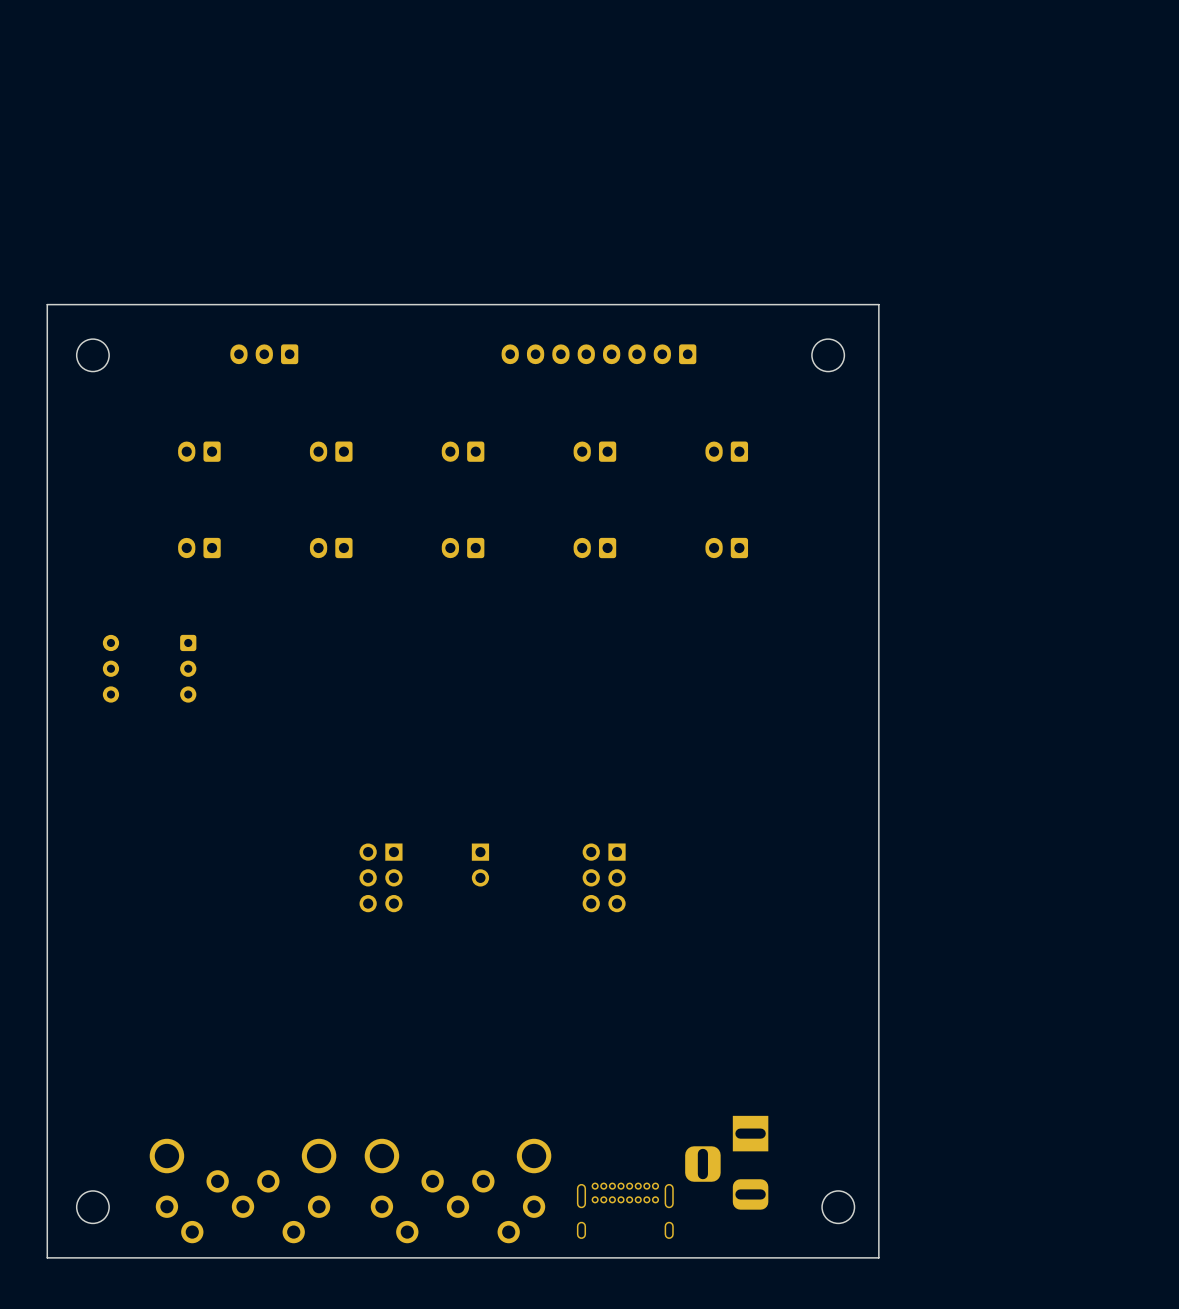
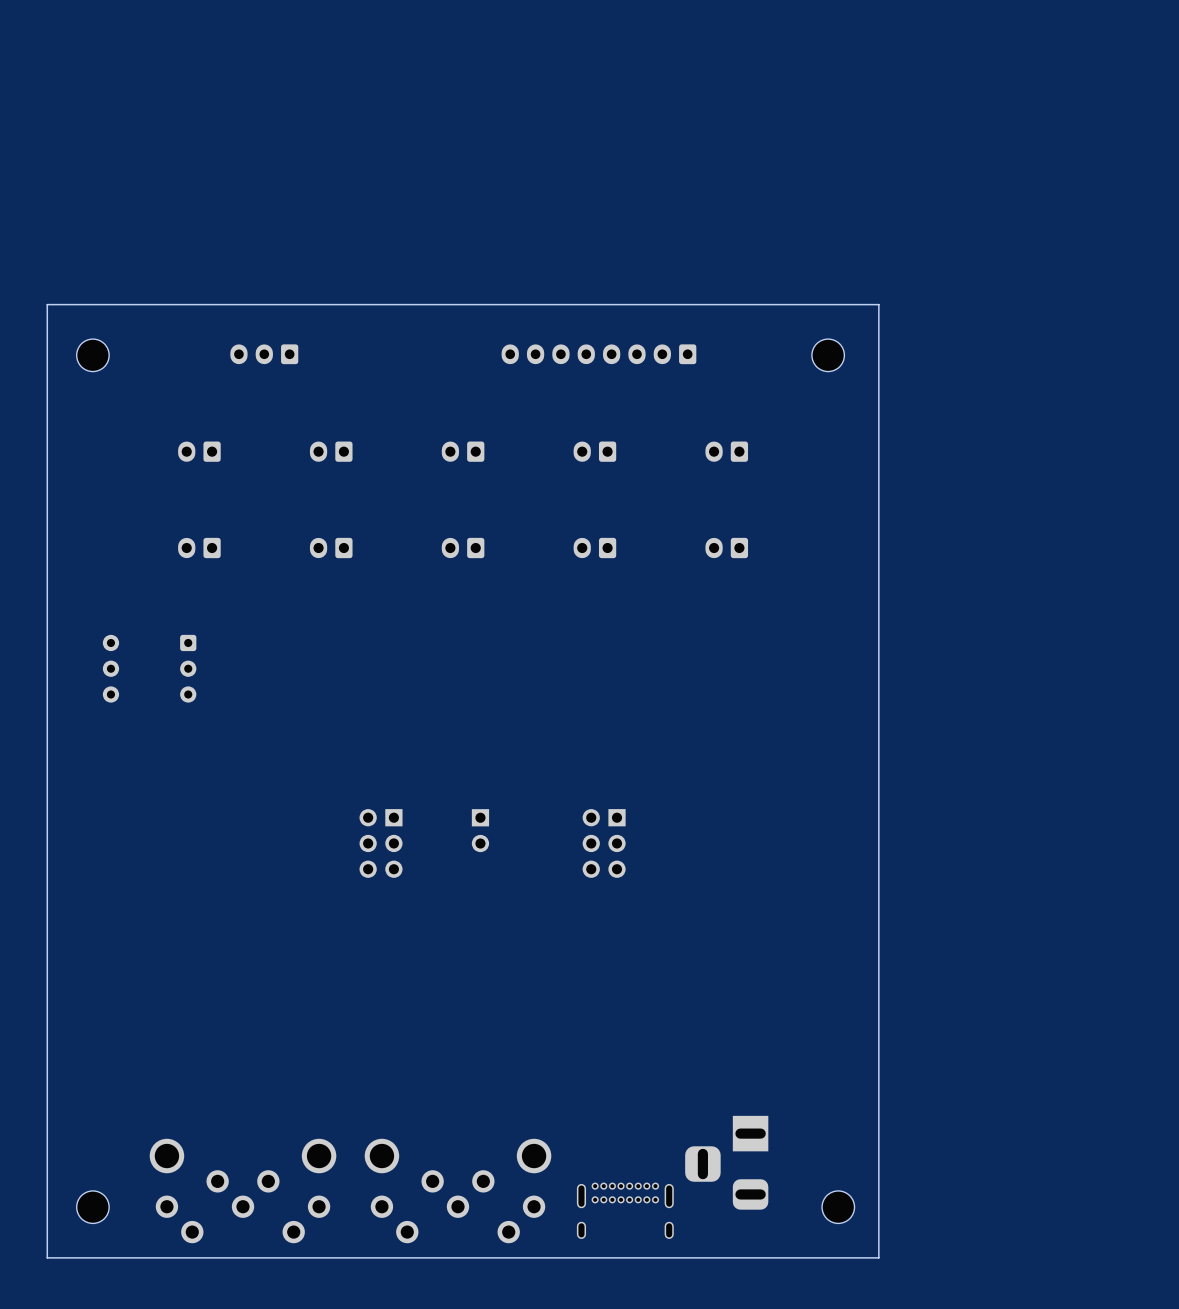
part position: (480, 865) -> (480, 830)
part position: (381, 877) -> (381, 843)
part position: (604, 877) -> (604, 843)

